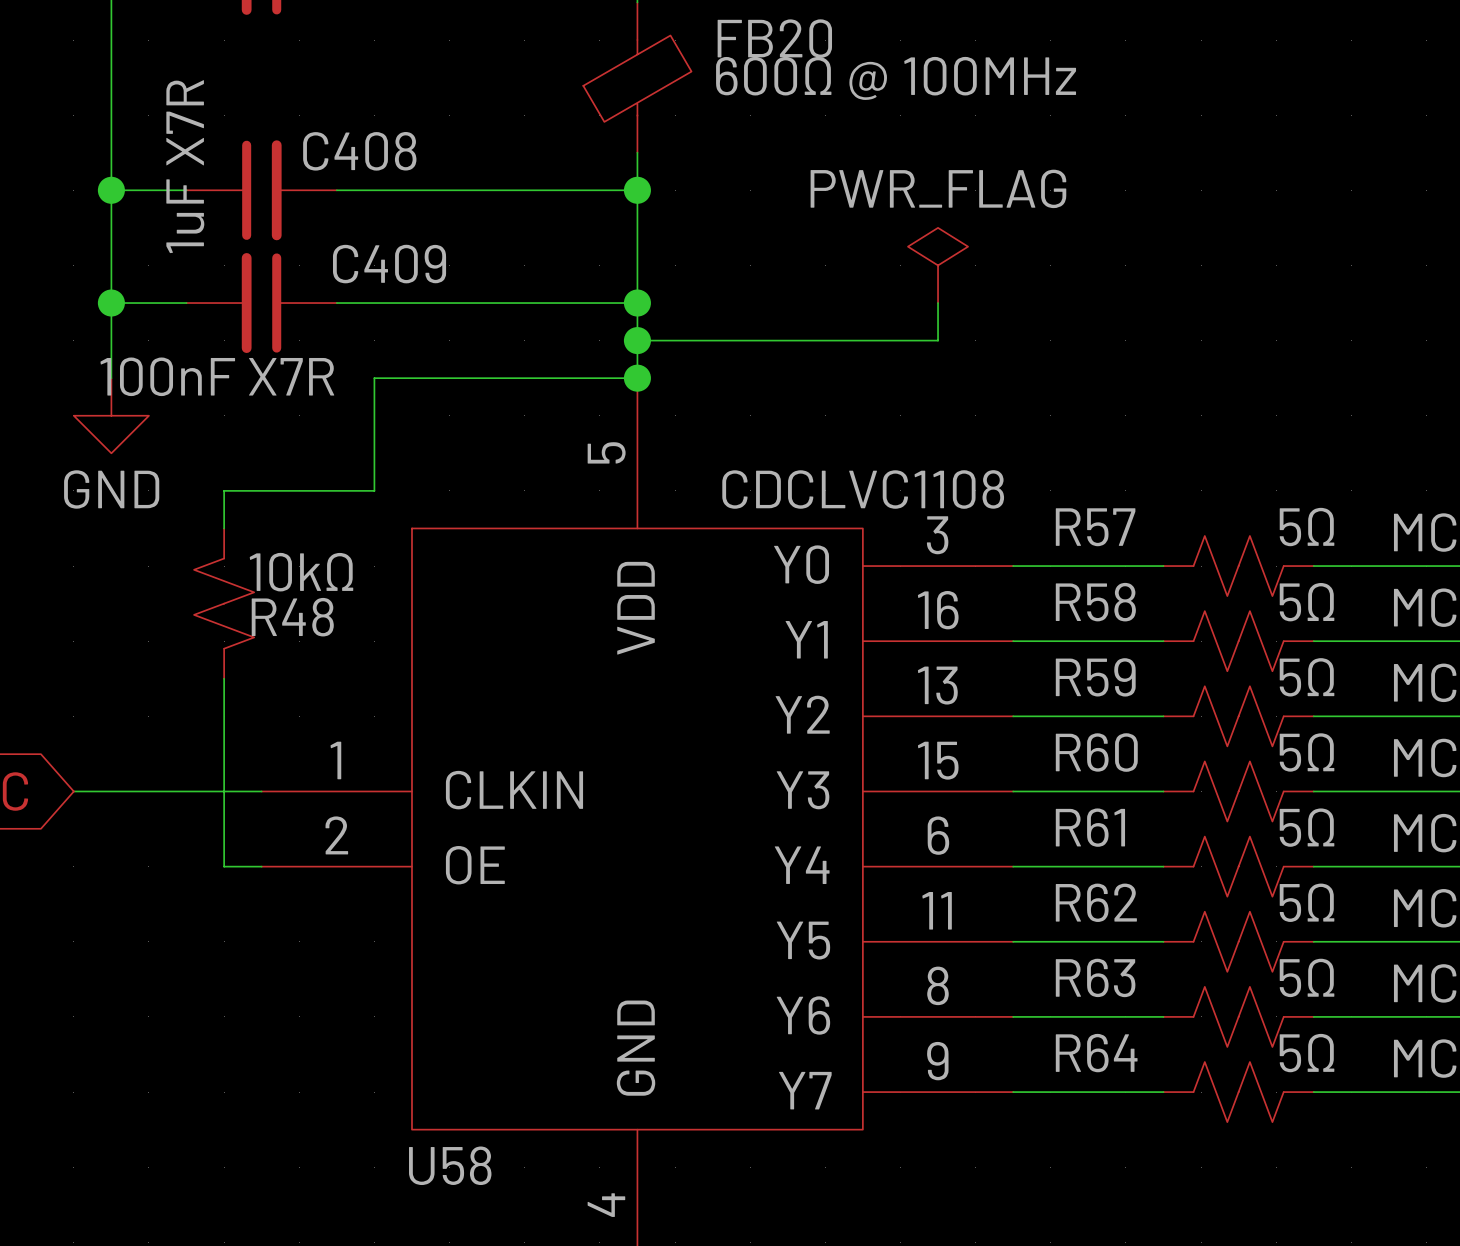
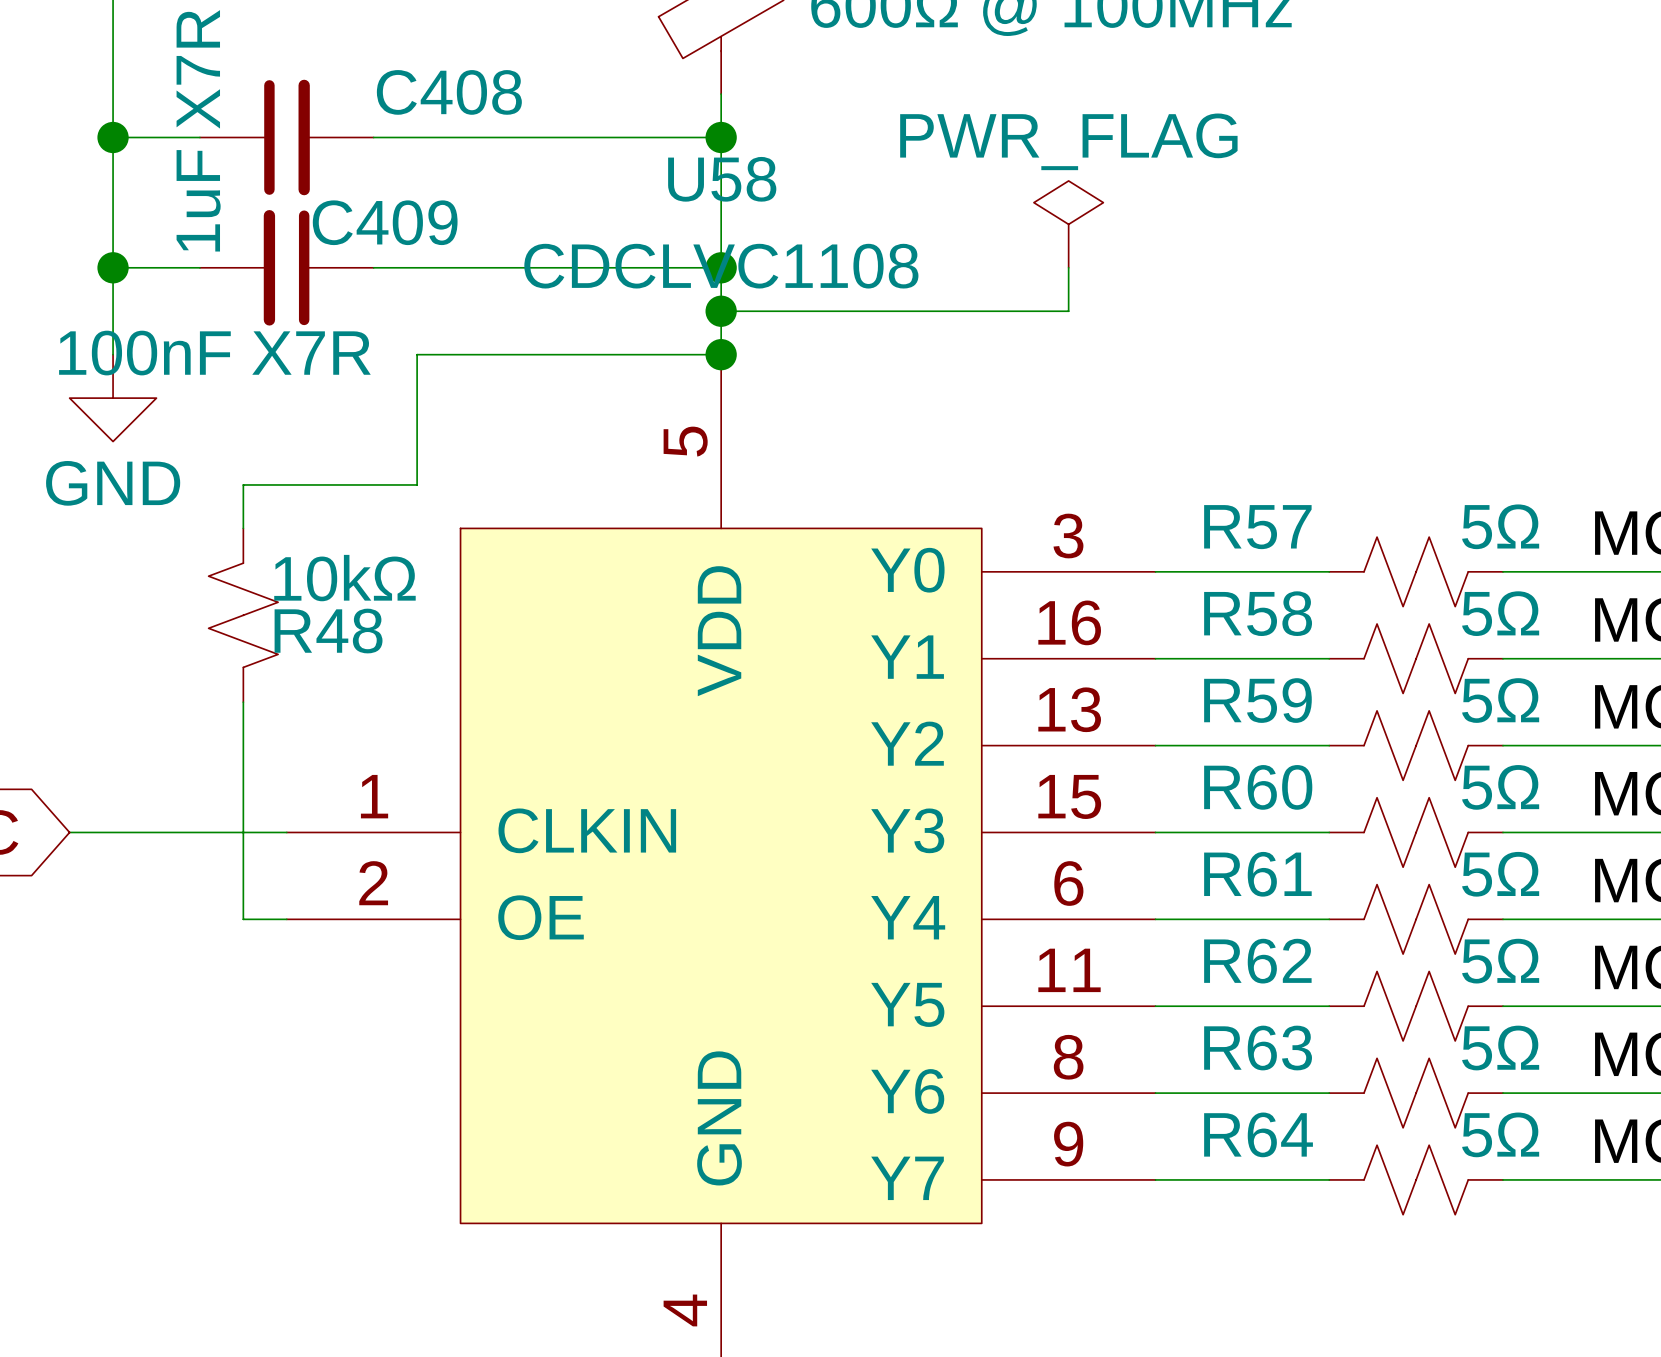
C408 name position: C408 (359, 151) -> C408 (449, 92)
C409 name position: C409 (389, 264) -> C409 (385, 222)
U58 value position: CDCLVC1108 (863, 489) -> CDCLVC1108 (721, 266)
U58 name position: U58 (450, 1165) -> U58 (722, 179)

